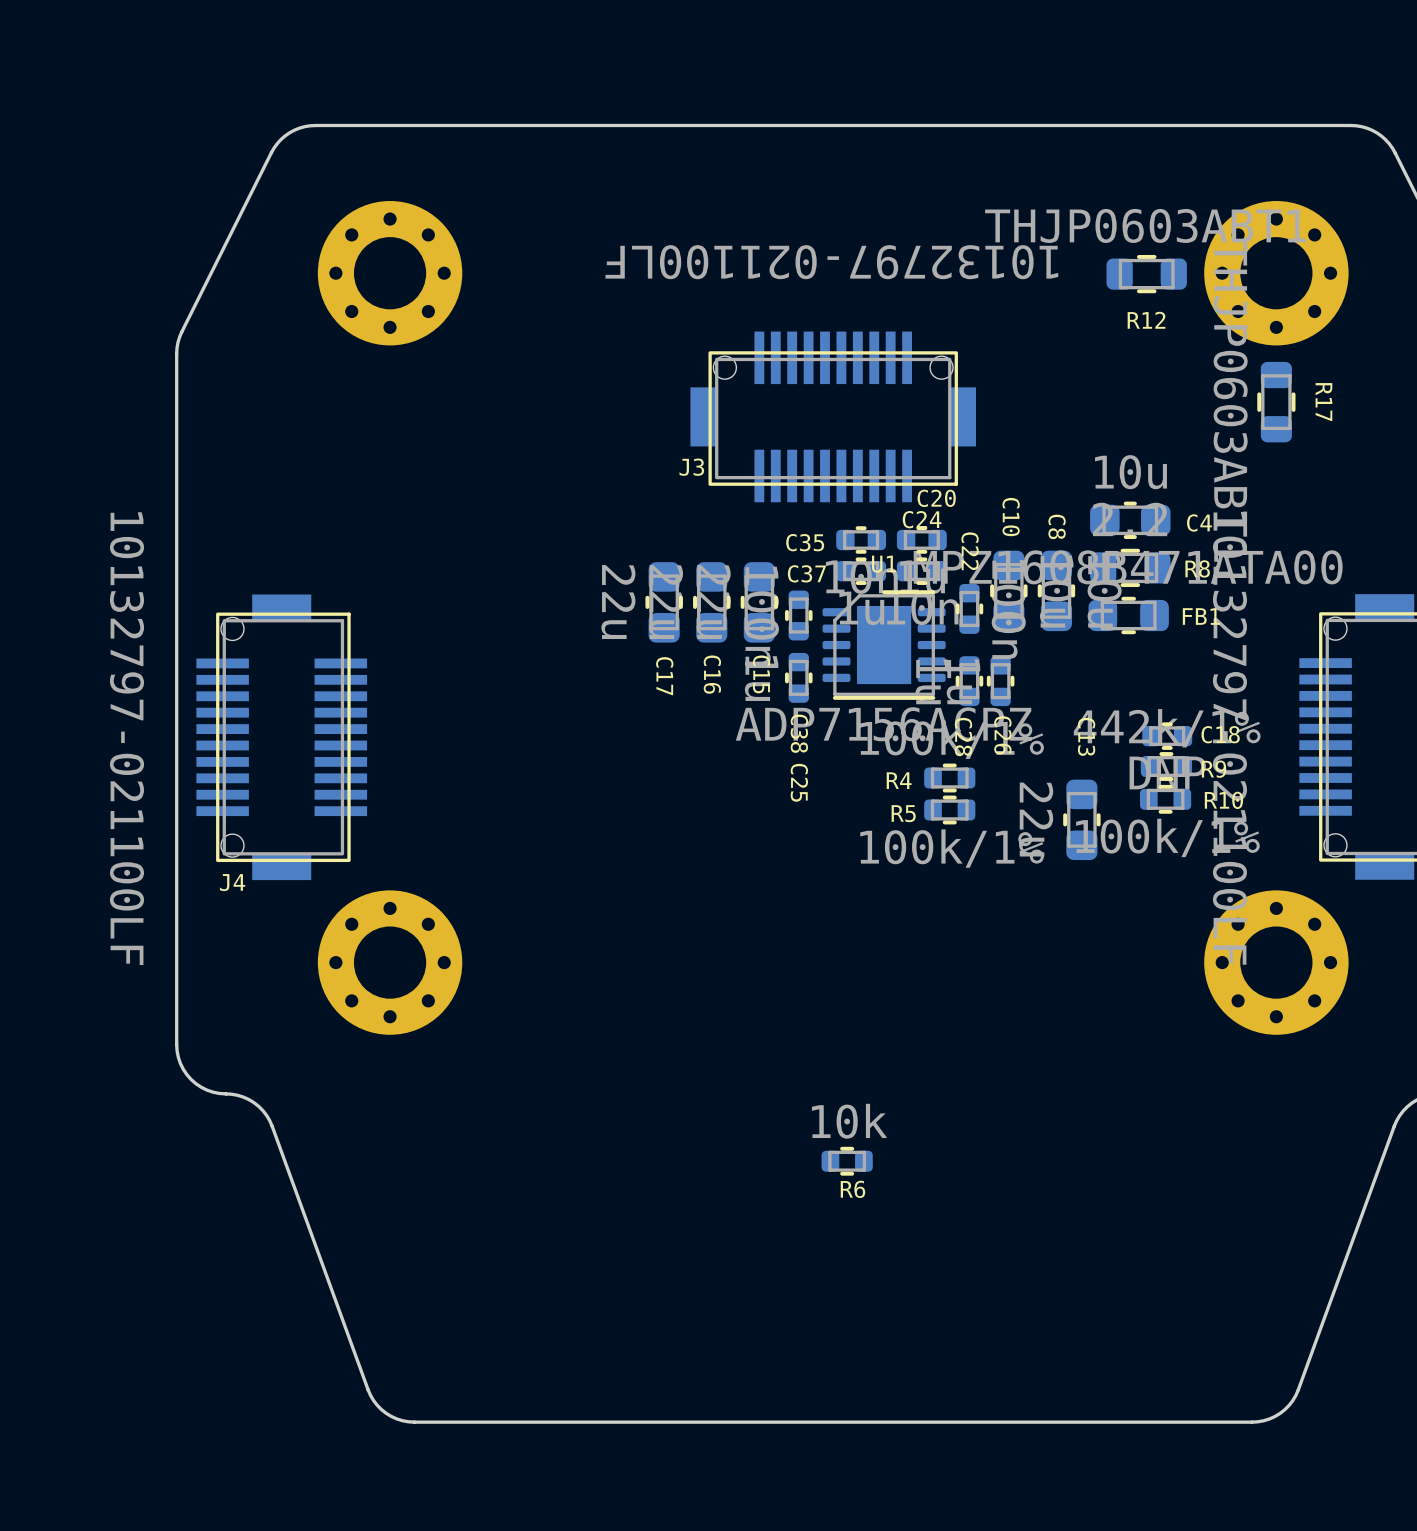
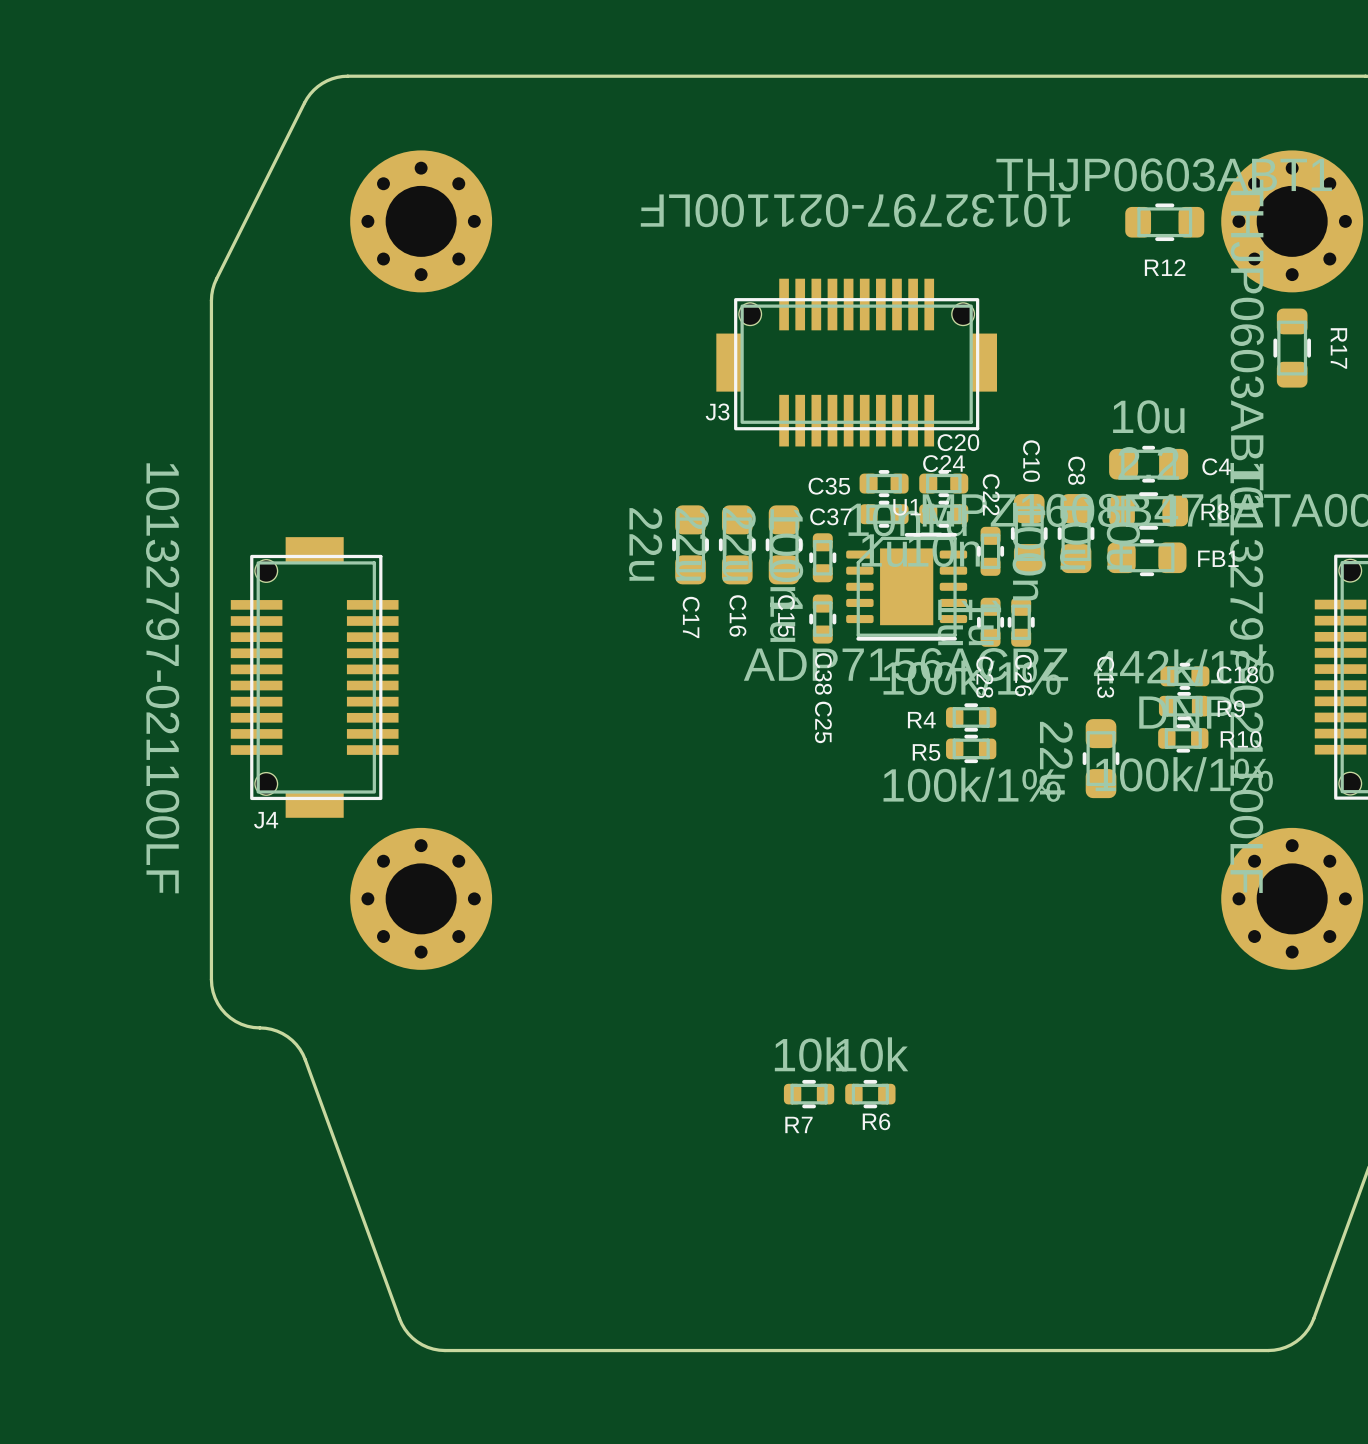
R7: none -> 10k (809, 1094)

